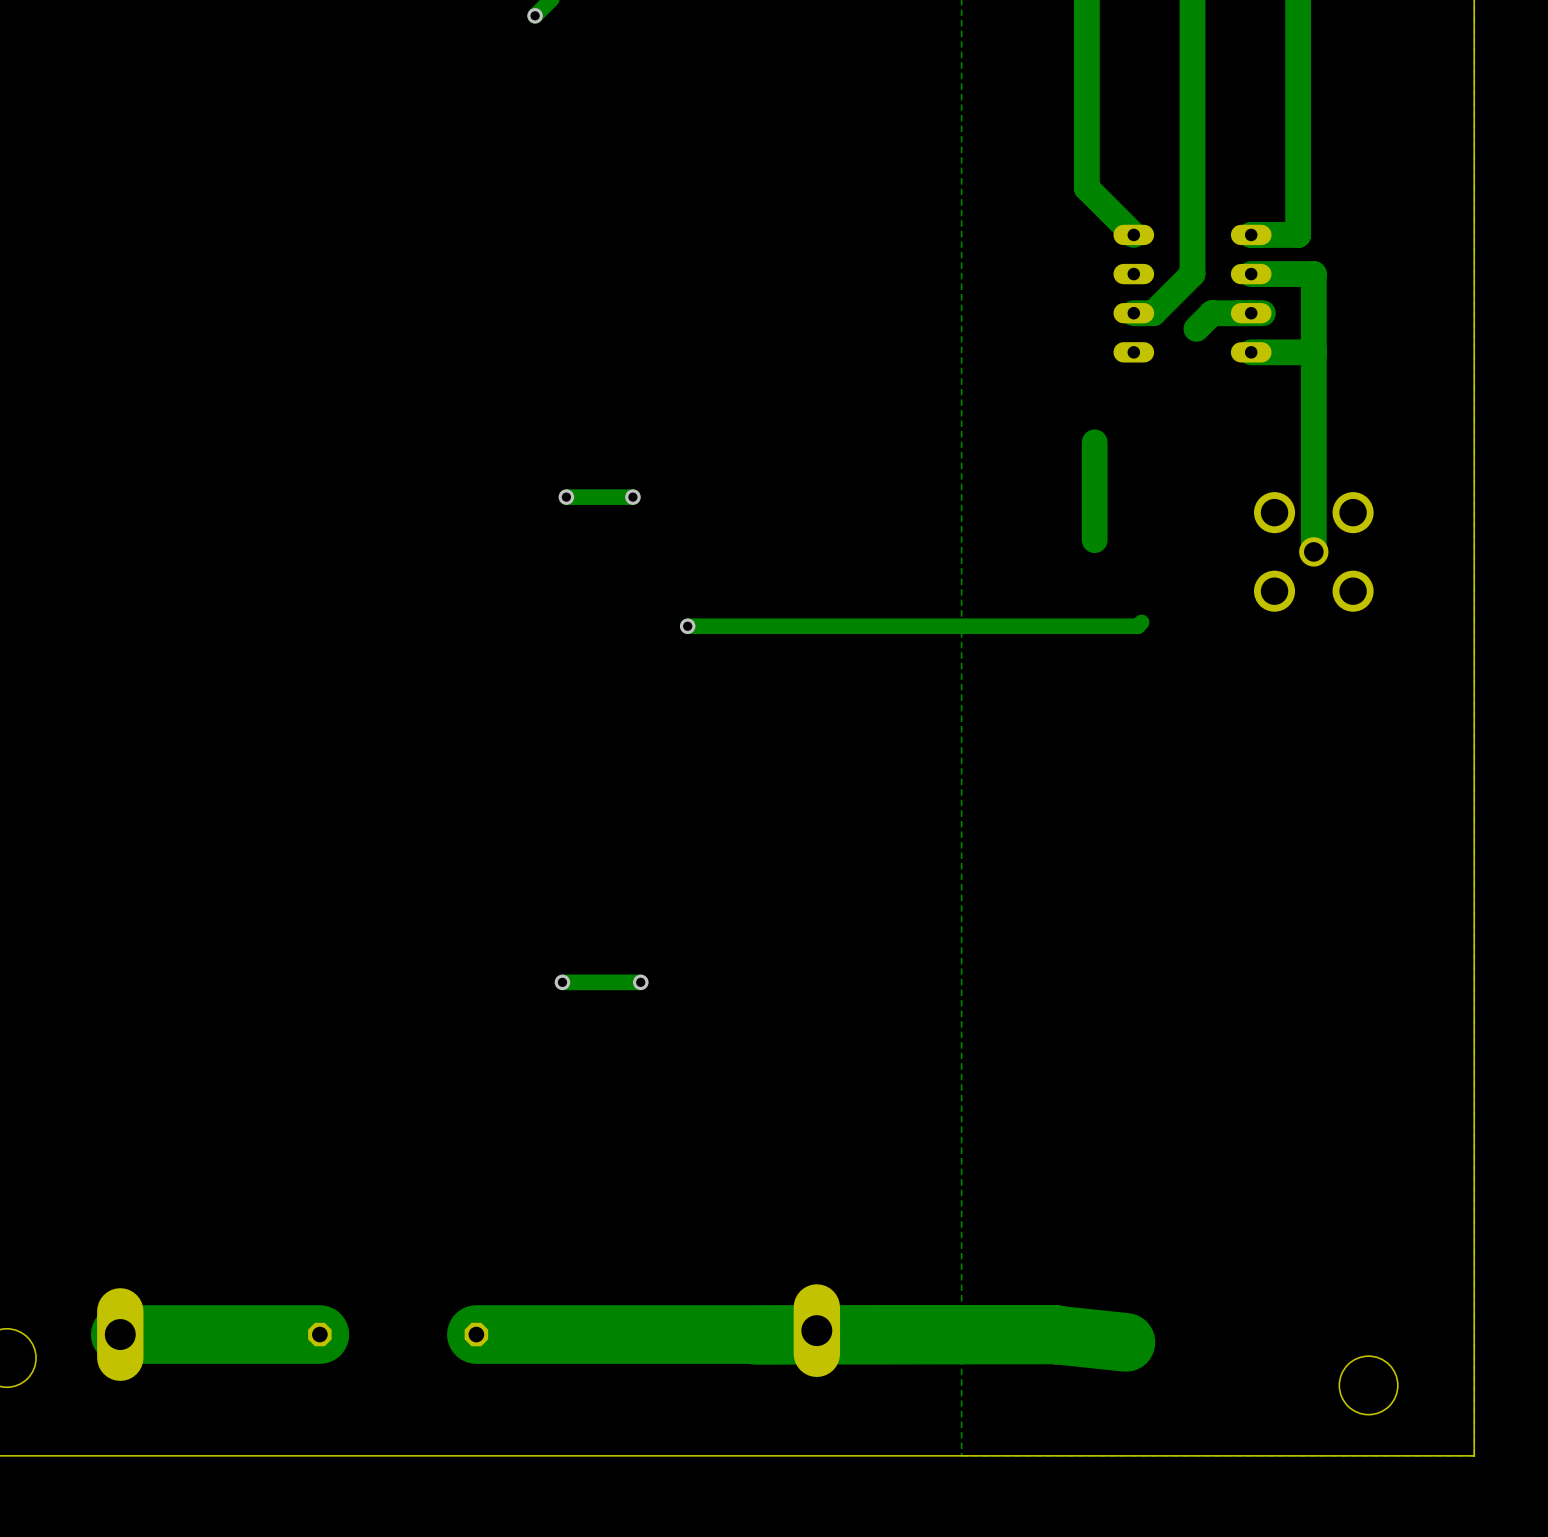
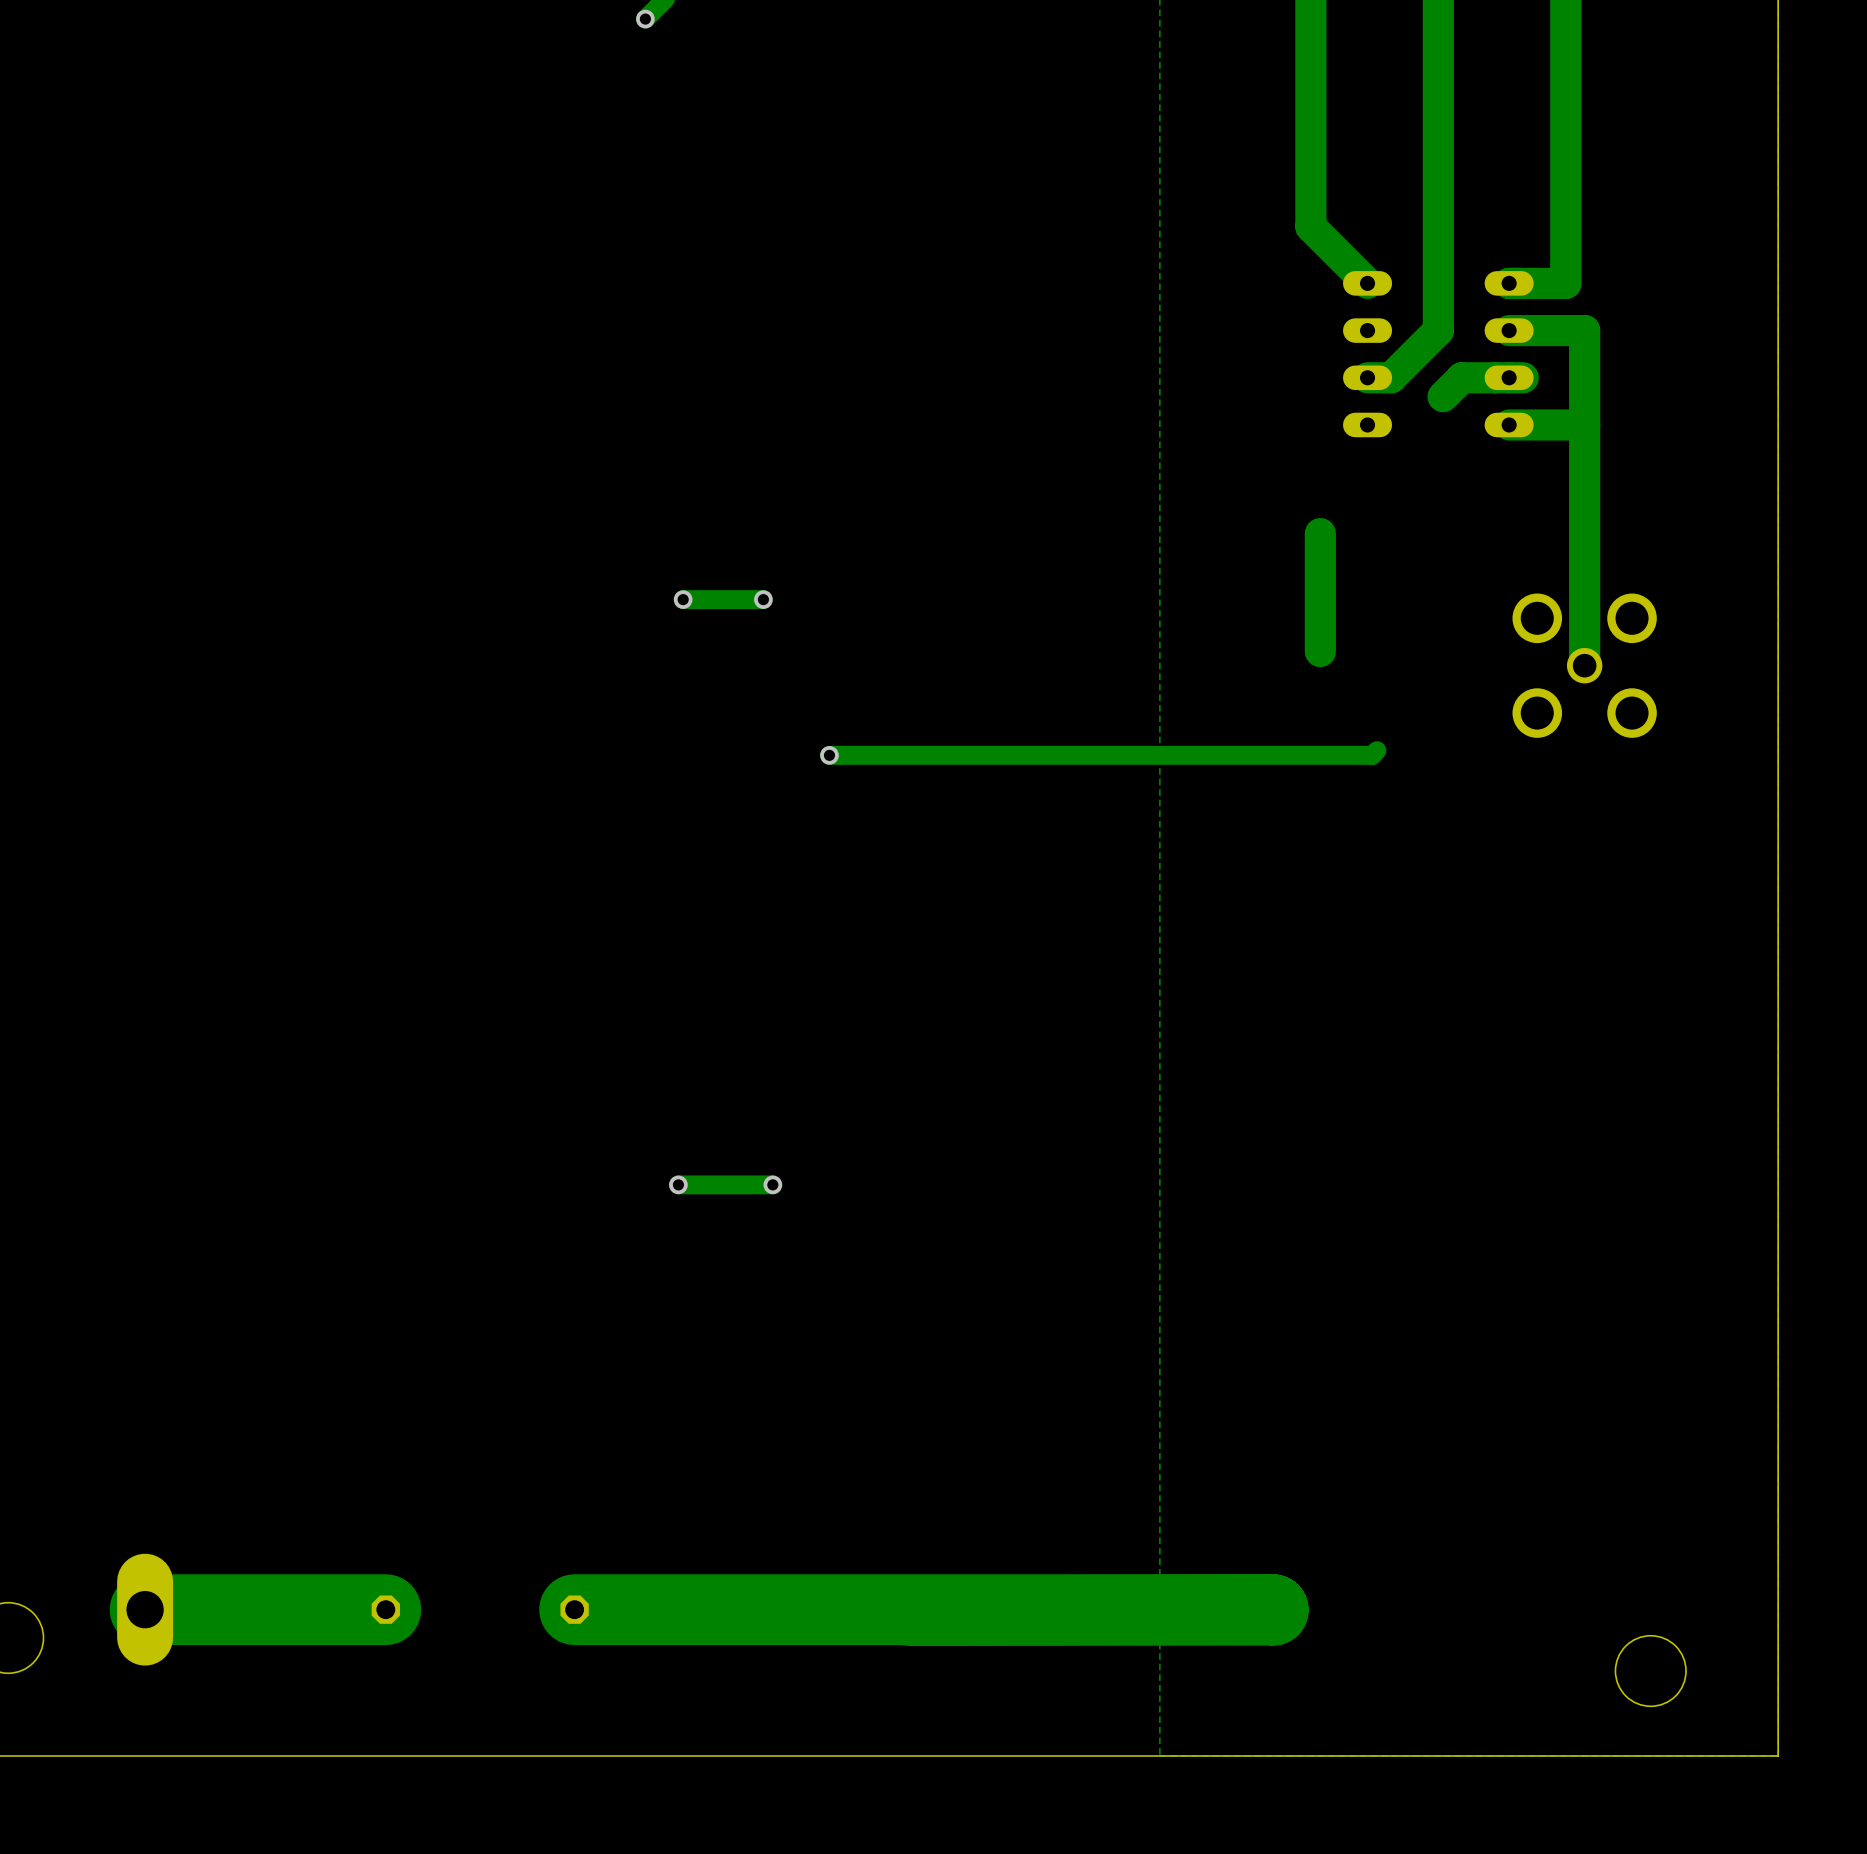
part: (816, 1330) -> none
track: (1055, 1334) (1125, 1342) -> none

